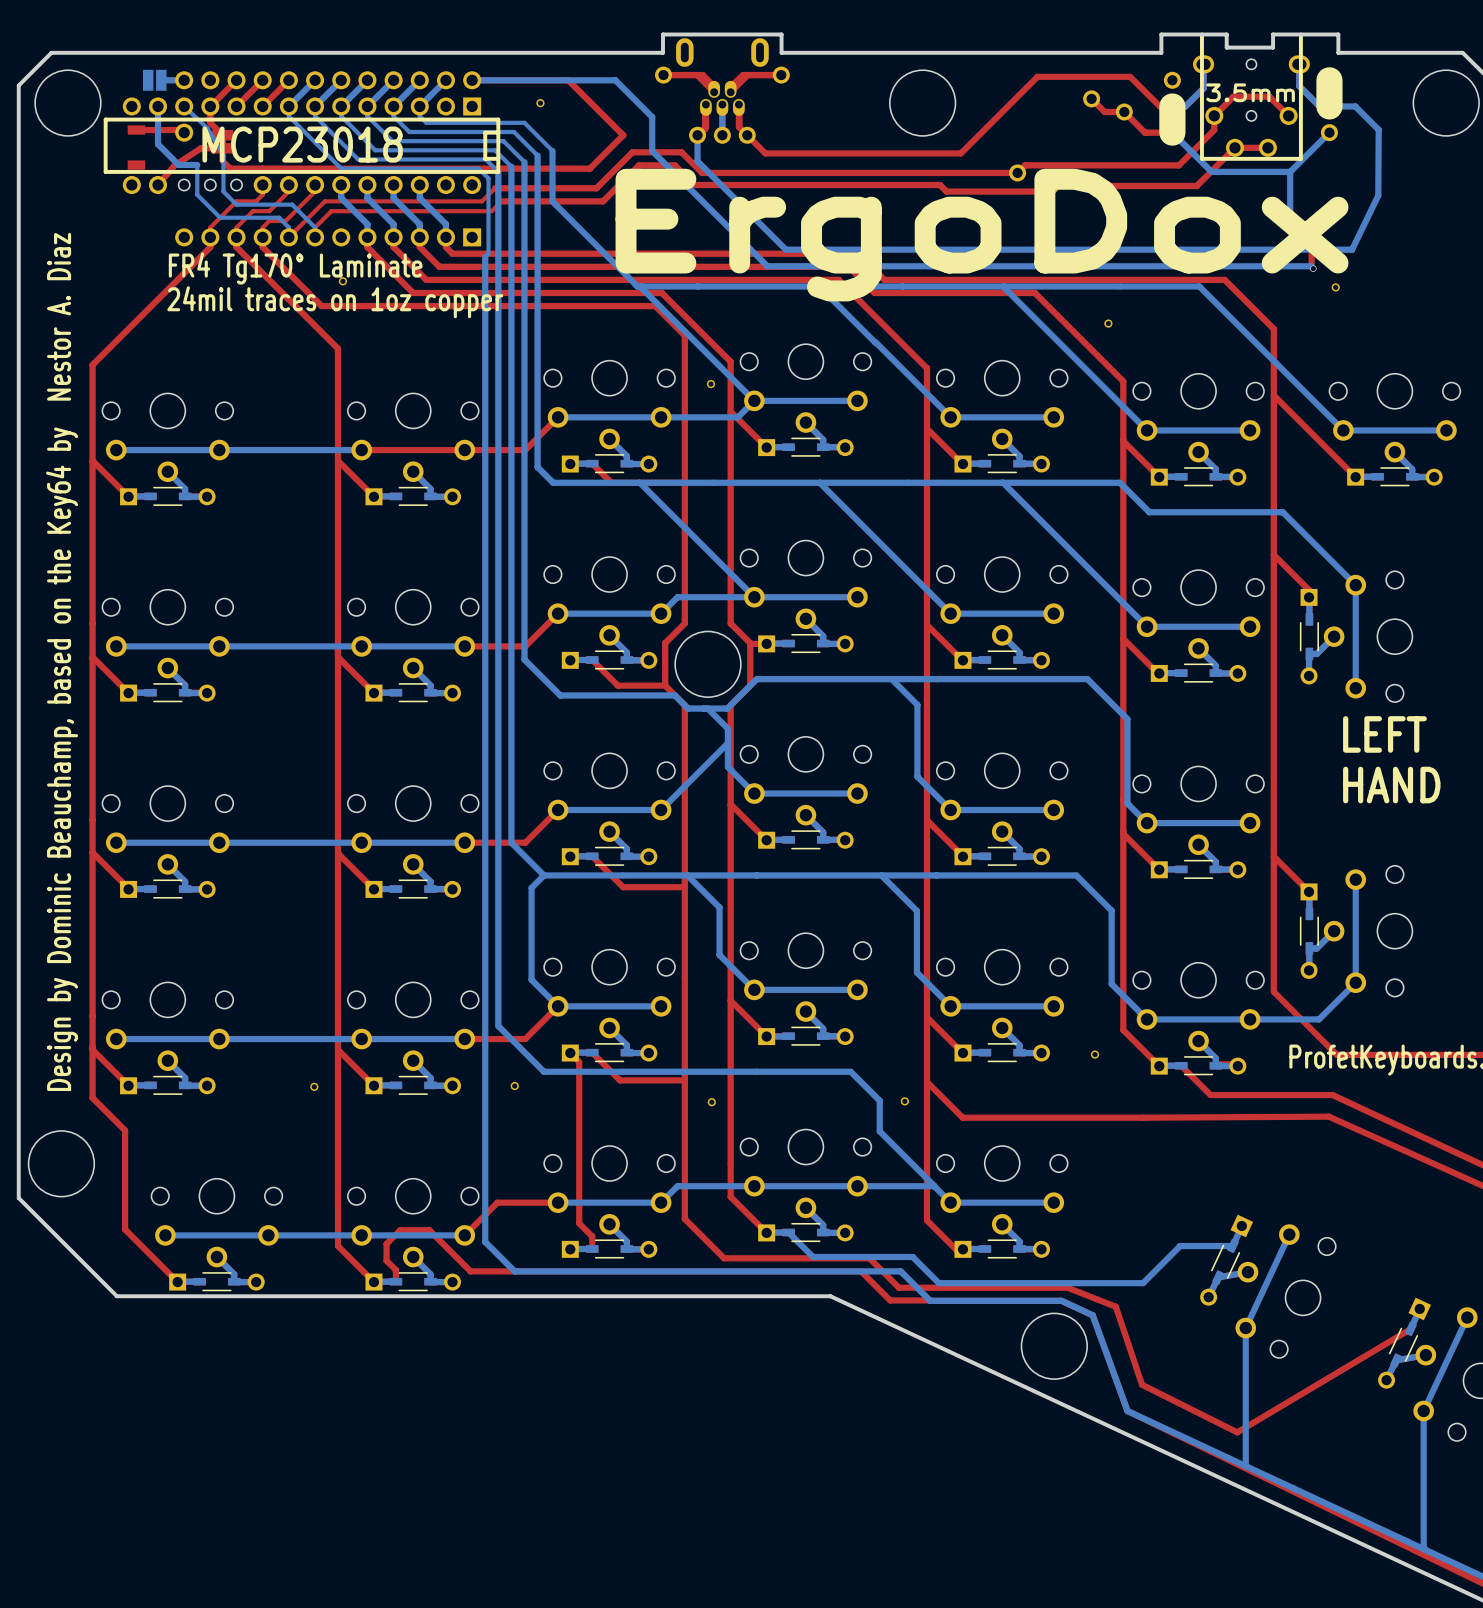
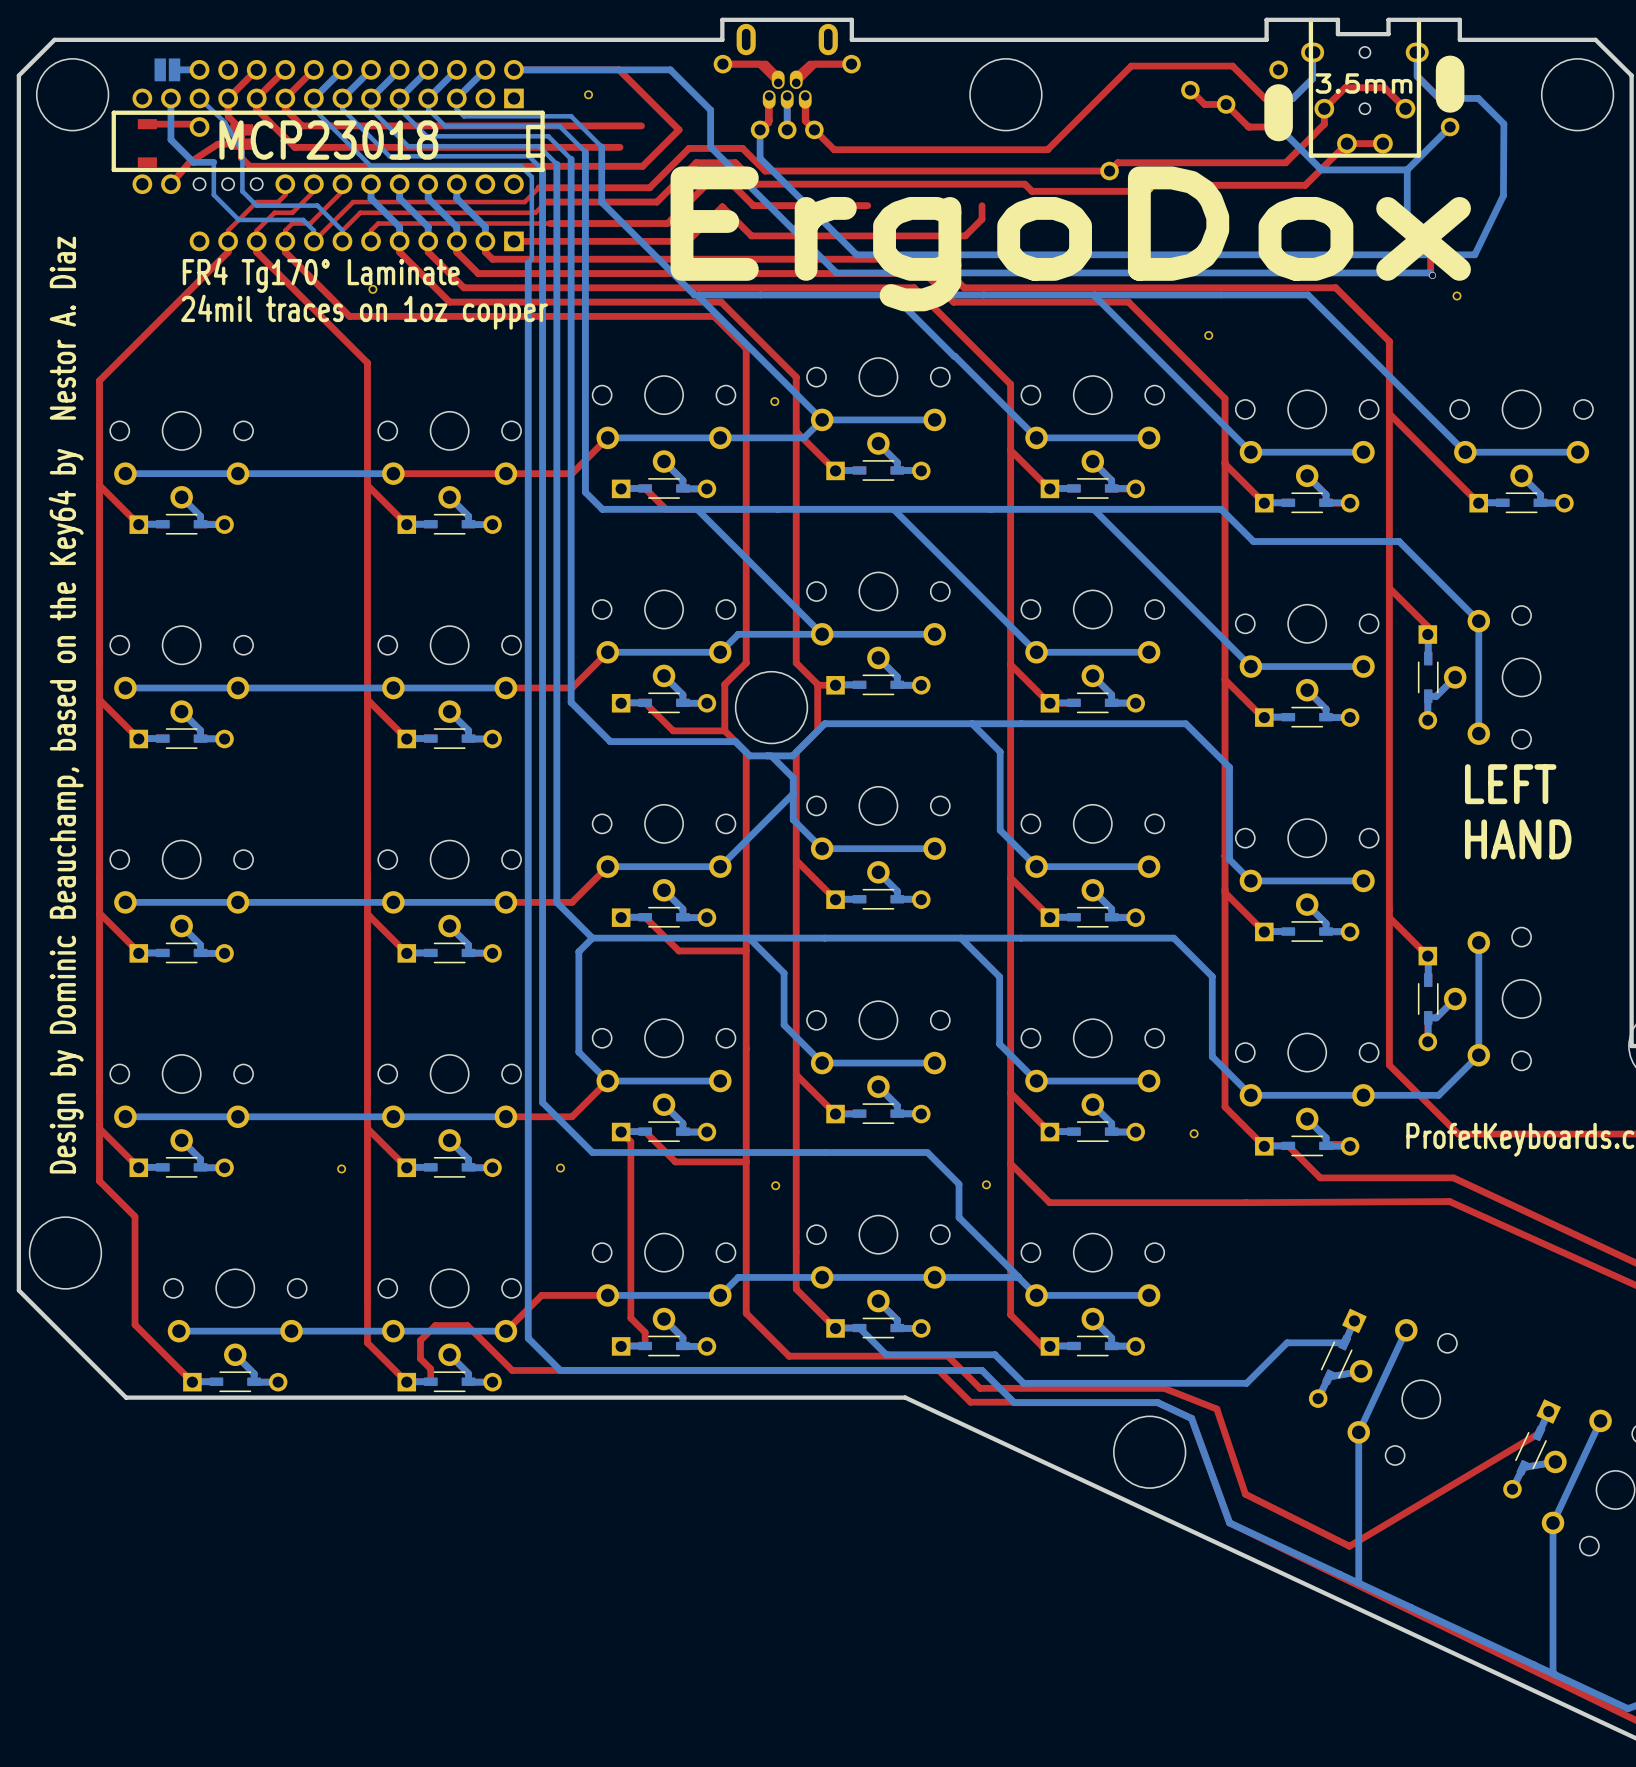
top track: none -> (256, 98) (256, 109) (294, 147) (620, 147)
top track: none -> (285, 98) (285, 109) (302, 125) (641, 125)
top track: none -> (867, 205) (753, 205) (731, 184) (706, 184) (667, 223) (378, 223) (371, 230) (371, 241)
top track: none -> (982, 205) (982, 219) (965, 235) (751, 235) (722, 206) (687, 241) (513, 241)

